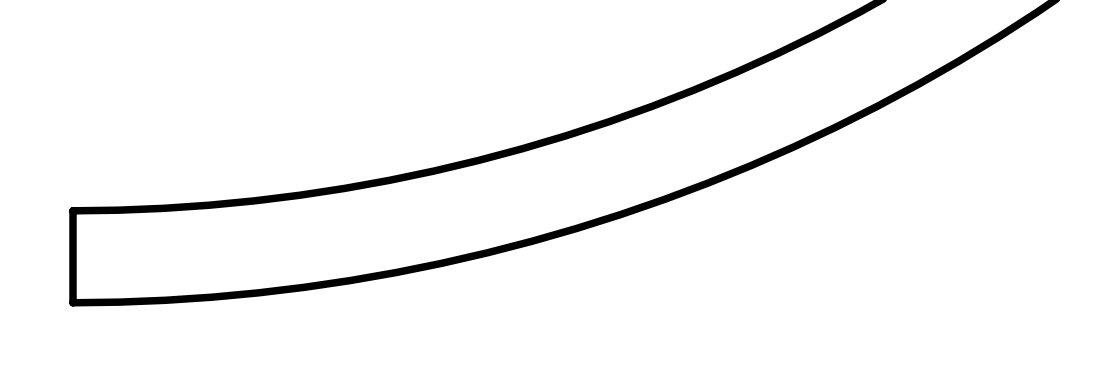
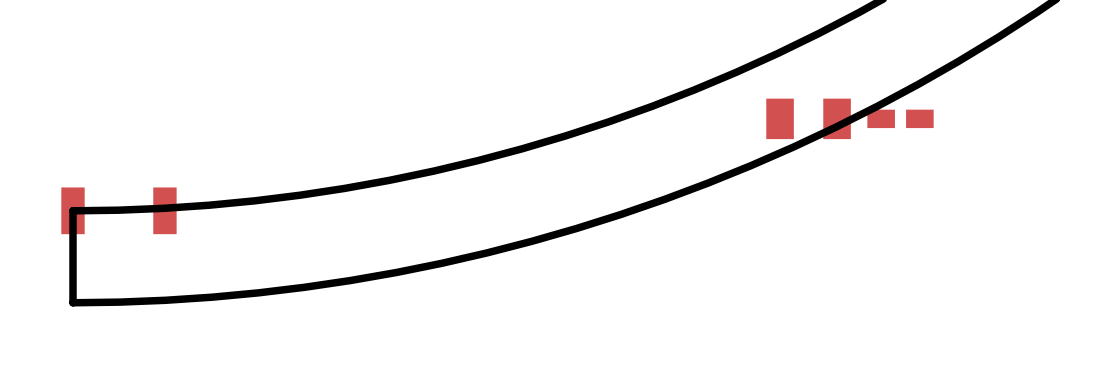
part: none -> (808, 118)
part: none -> (900, 118)
part: none -> (73, 210)
part: none -> (164, 210)

